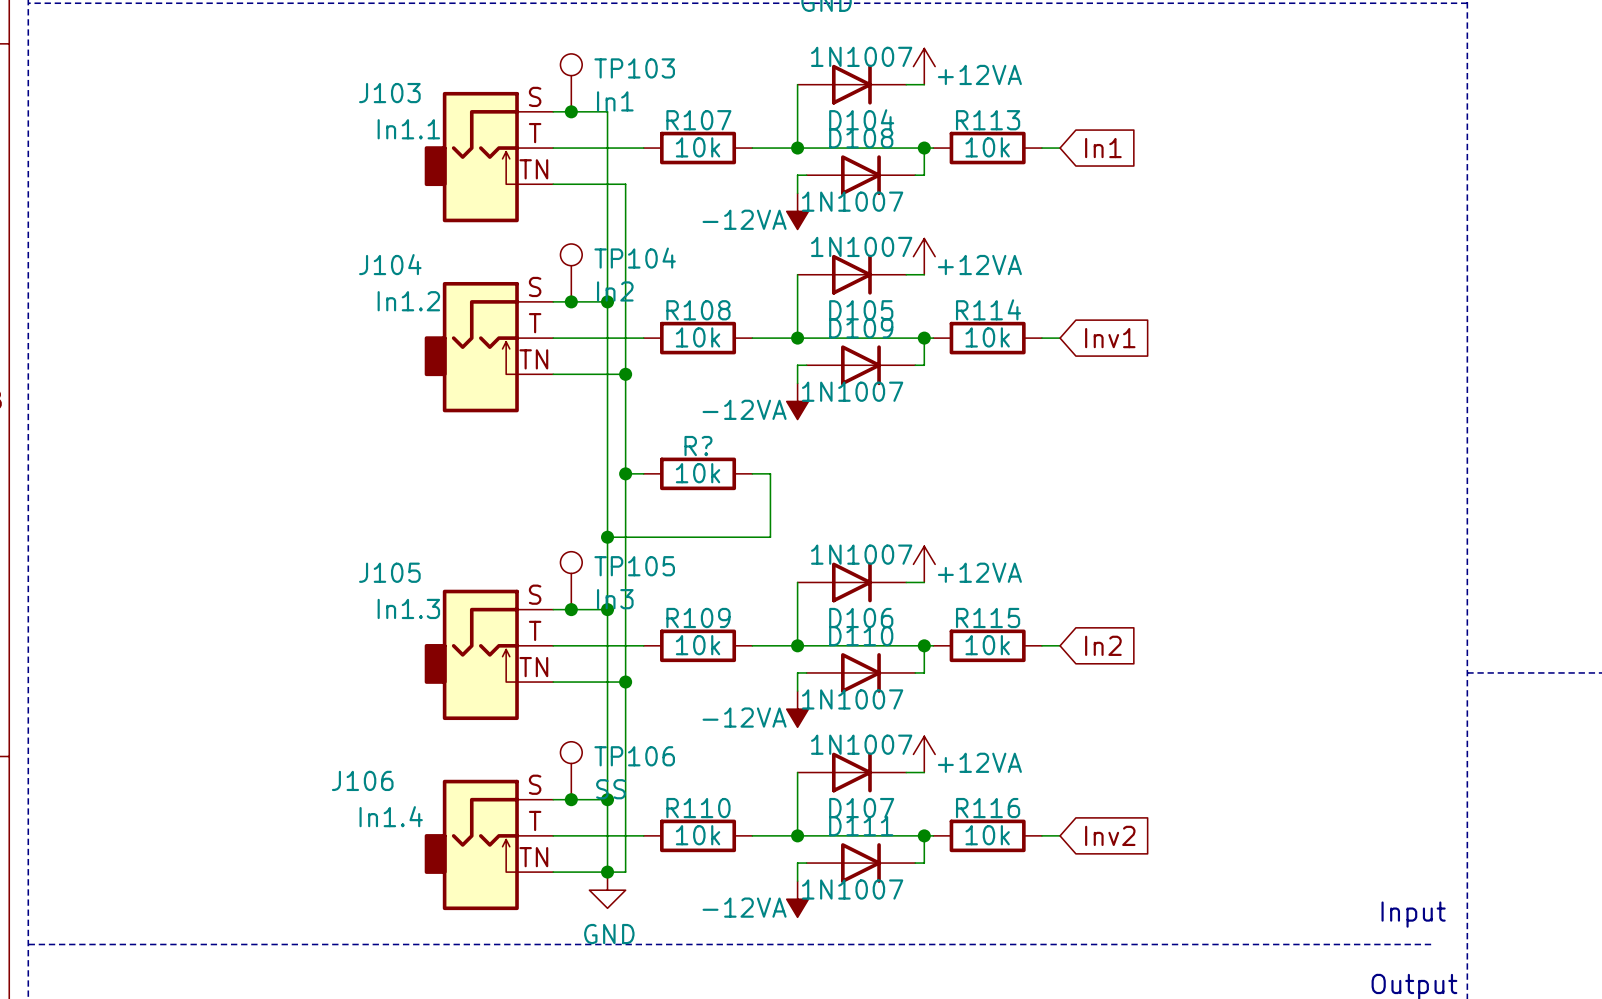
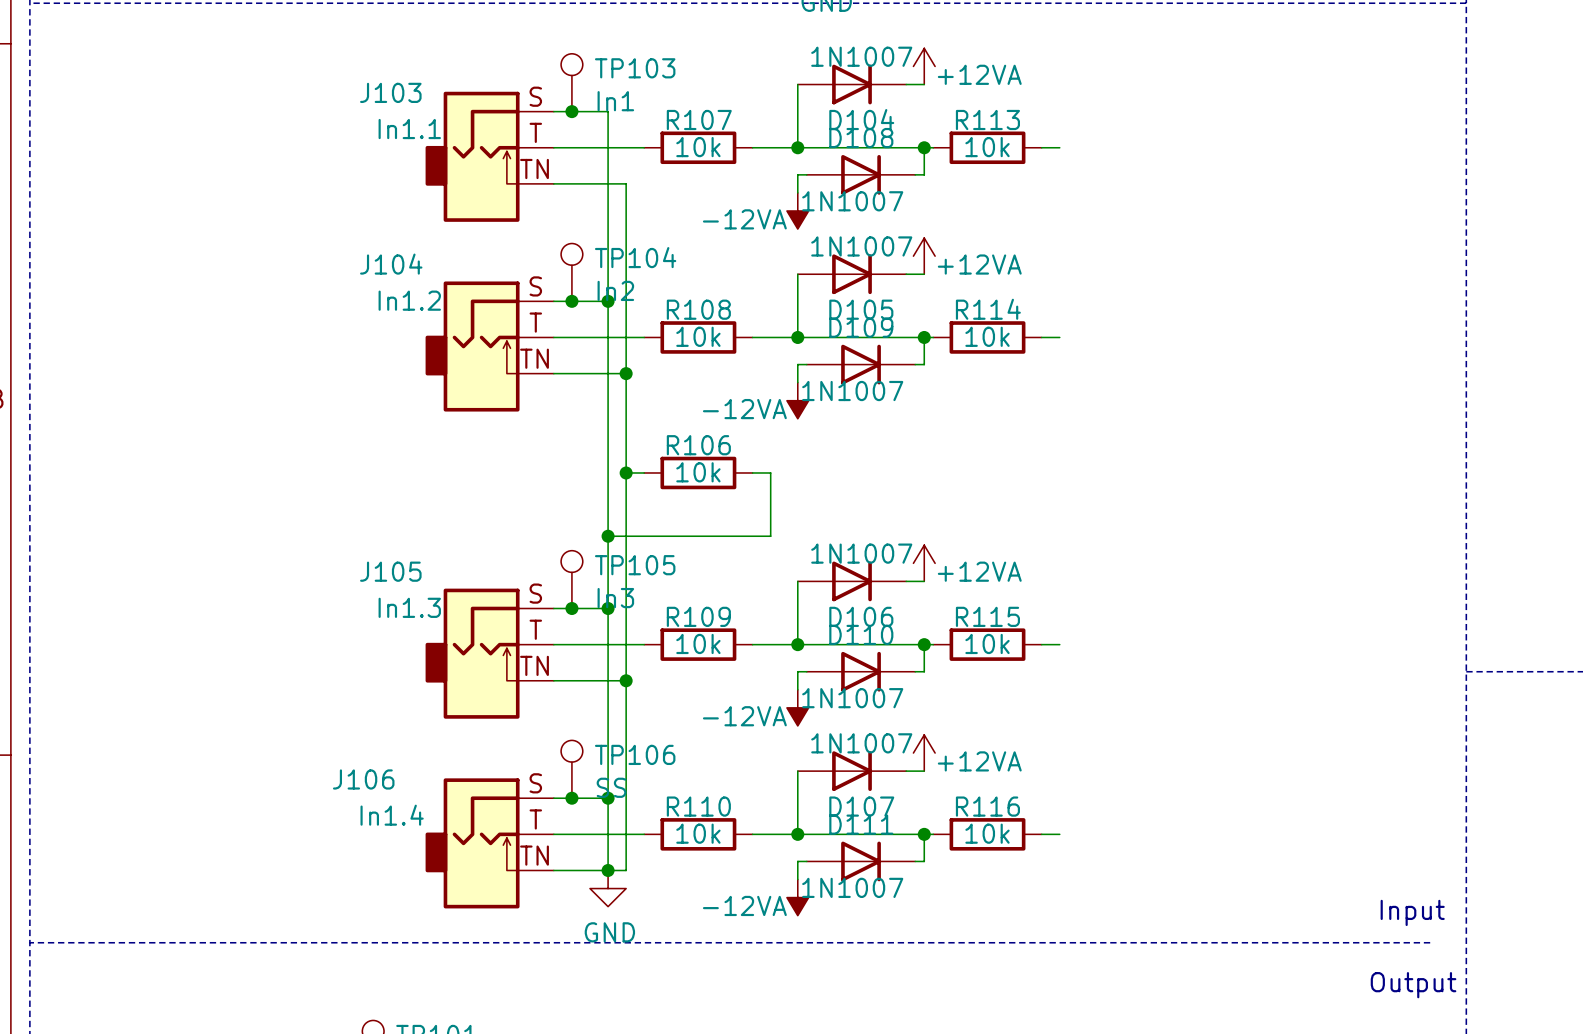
global label: In1 (1103, 148) -> none
global label: Inv1 (1110, 338) -> none
R? name: R? (698, 446) -> R106 (698, 445)
global label: In2 (1103, 645) -> none
global label: Inv2 (1110, 835) -> none

